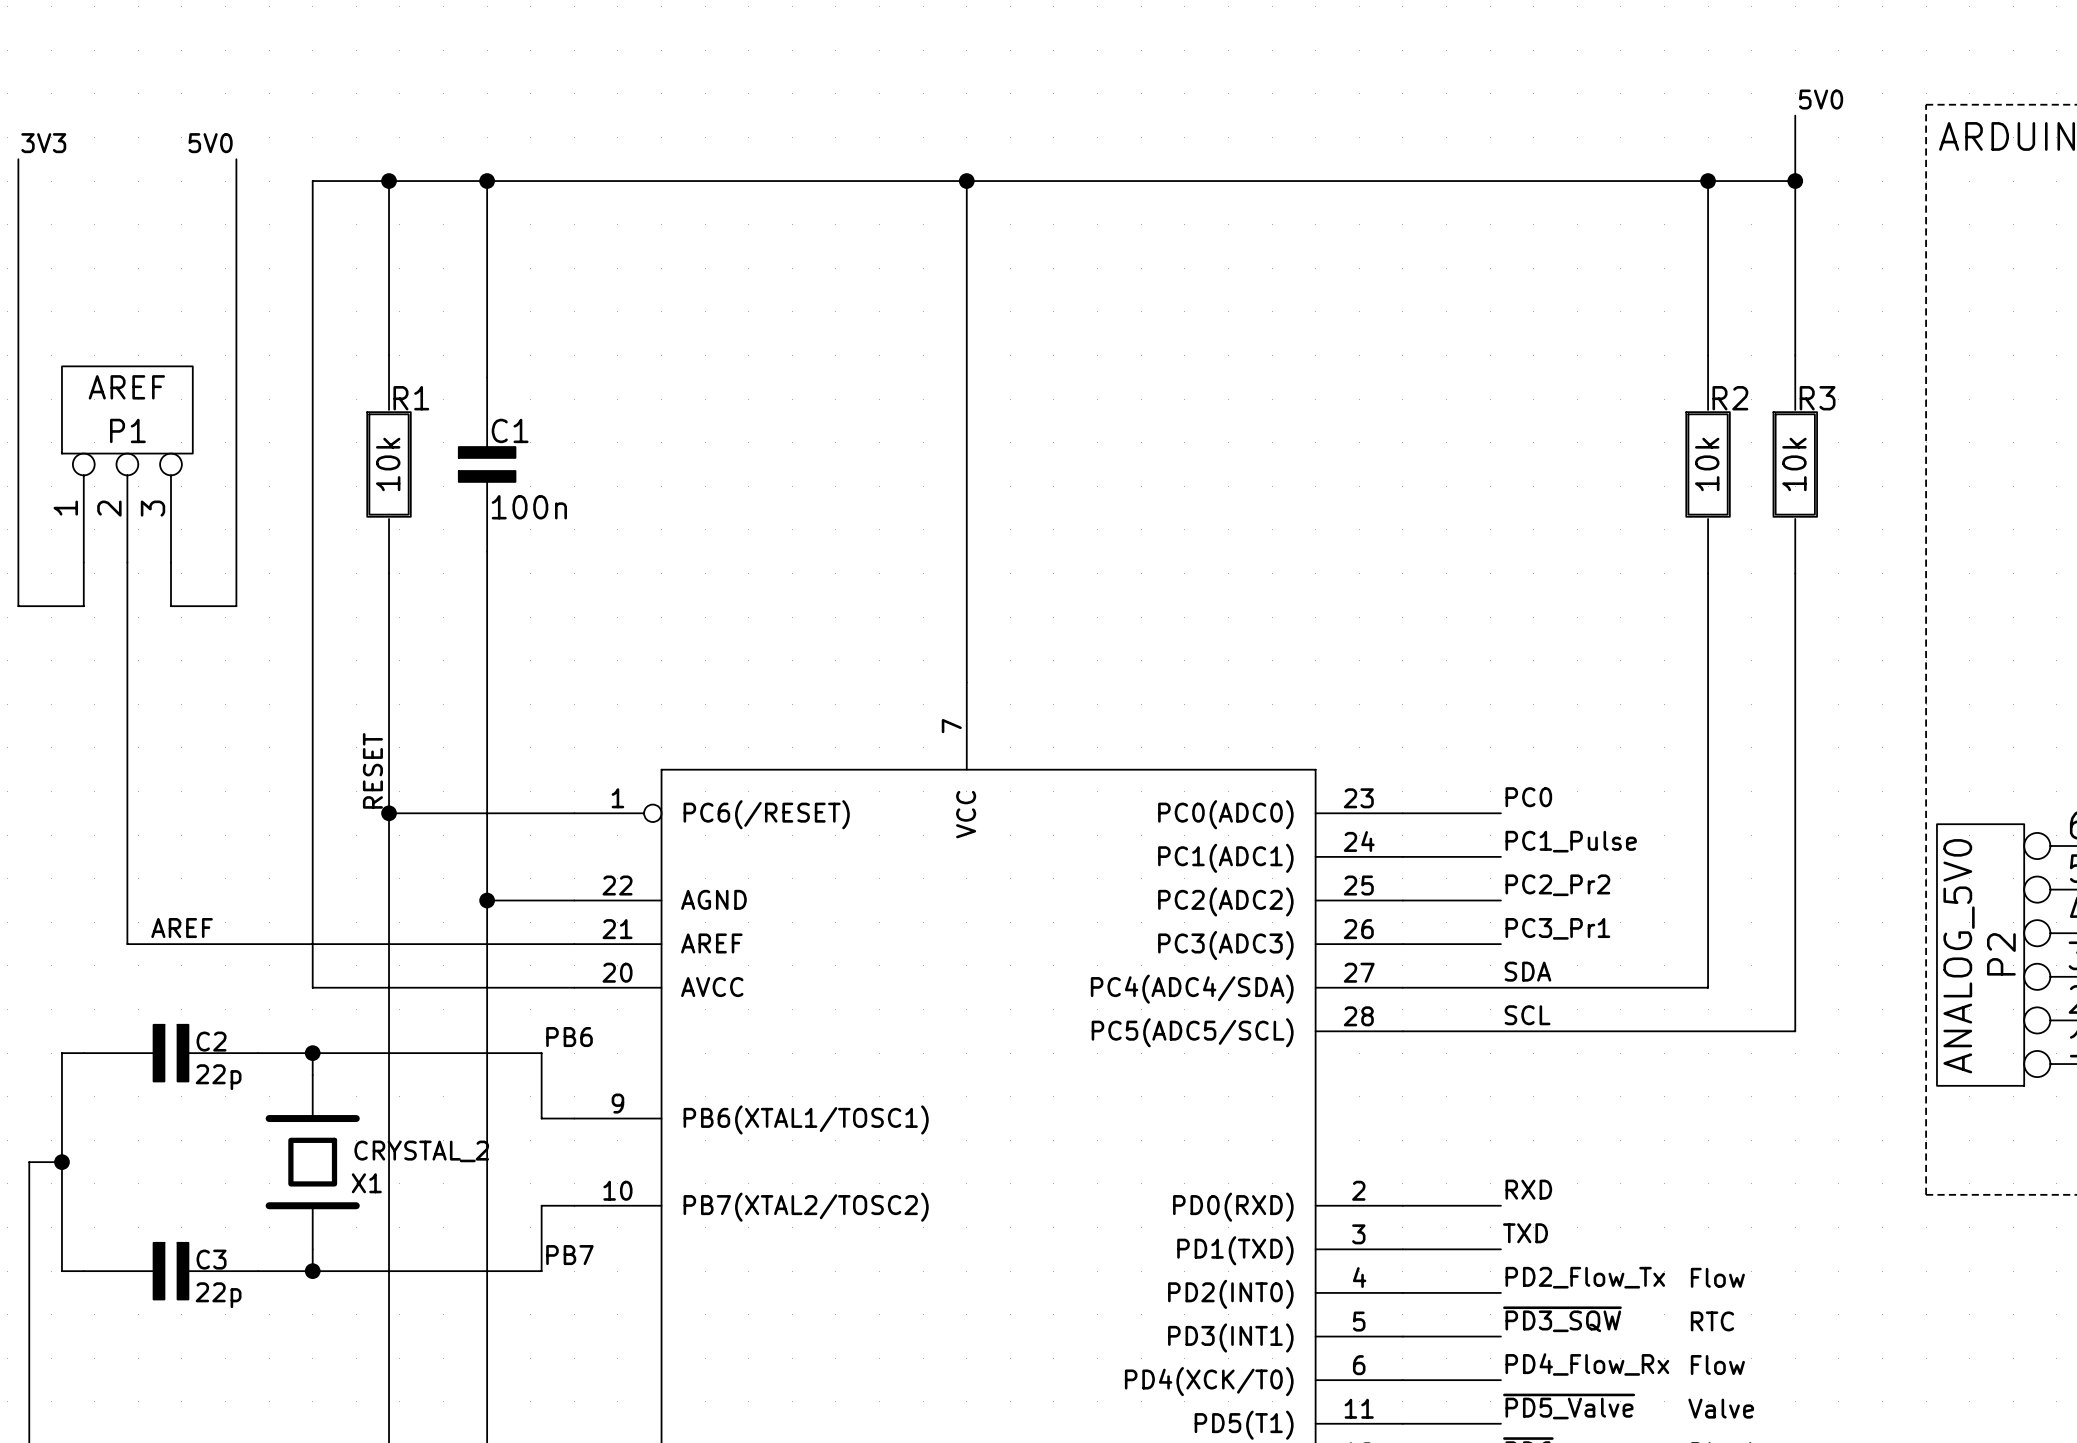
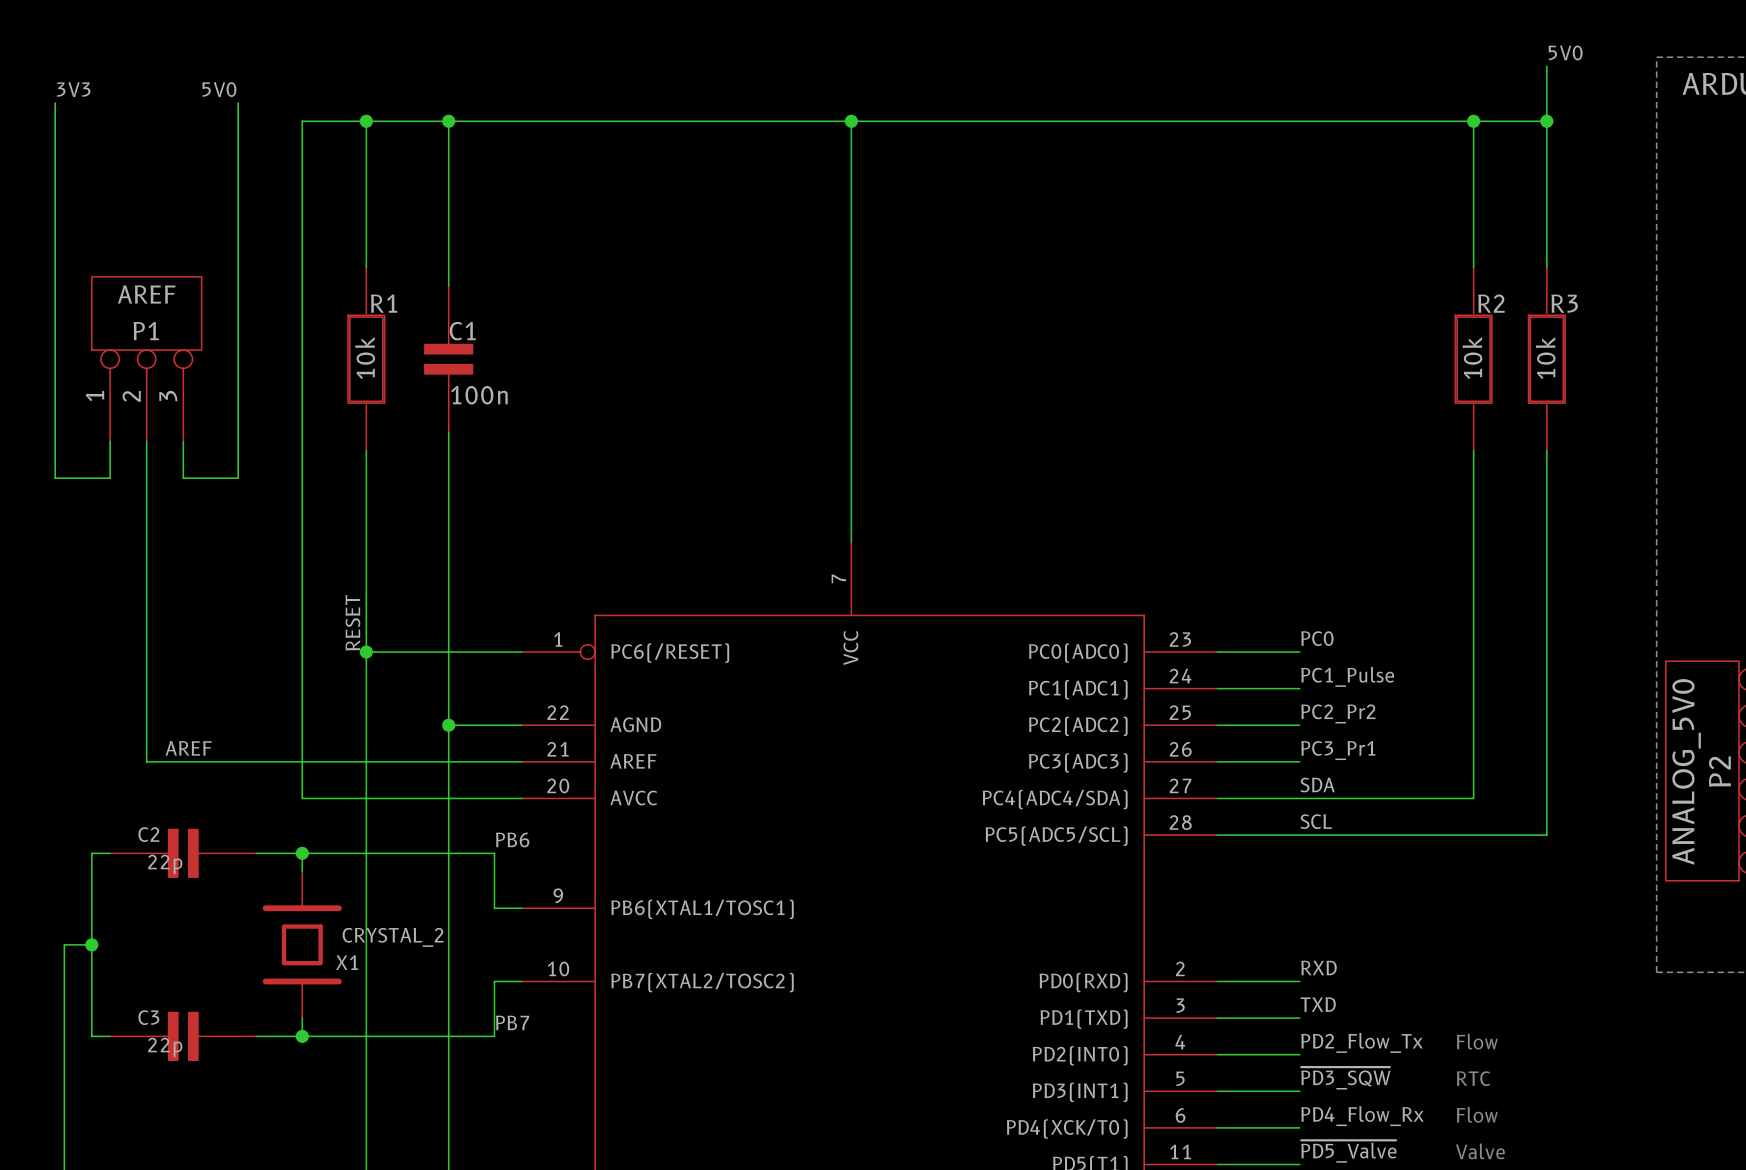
C2 name position: C2 (211, 1041) -> C2 (148, 834)
C2 value position: 22p (218, 1077) -> 22p (165, 864)
C3 name position: C3 (211, 1259) -> C3 (148, 1017)
C3 value position: 22p (218, 1295) -> 22p (165, 1047)

